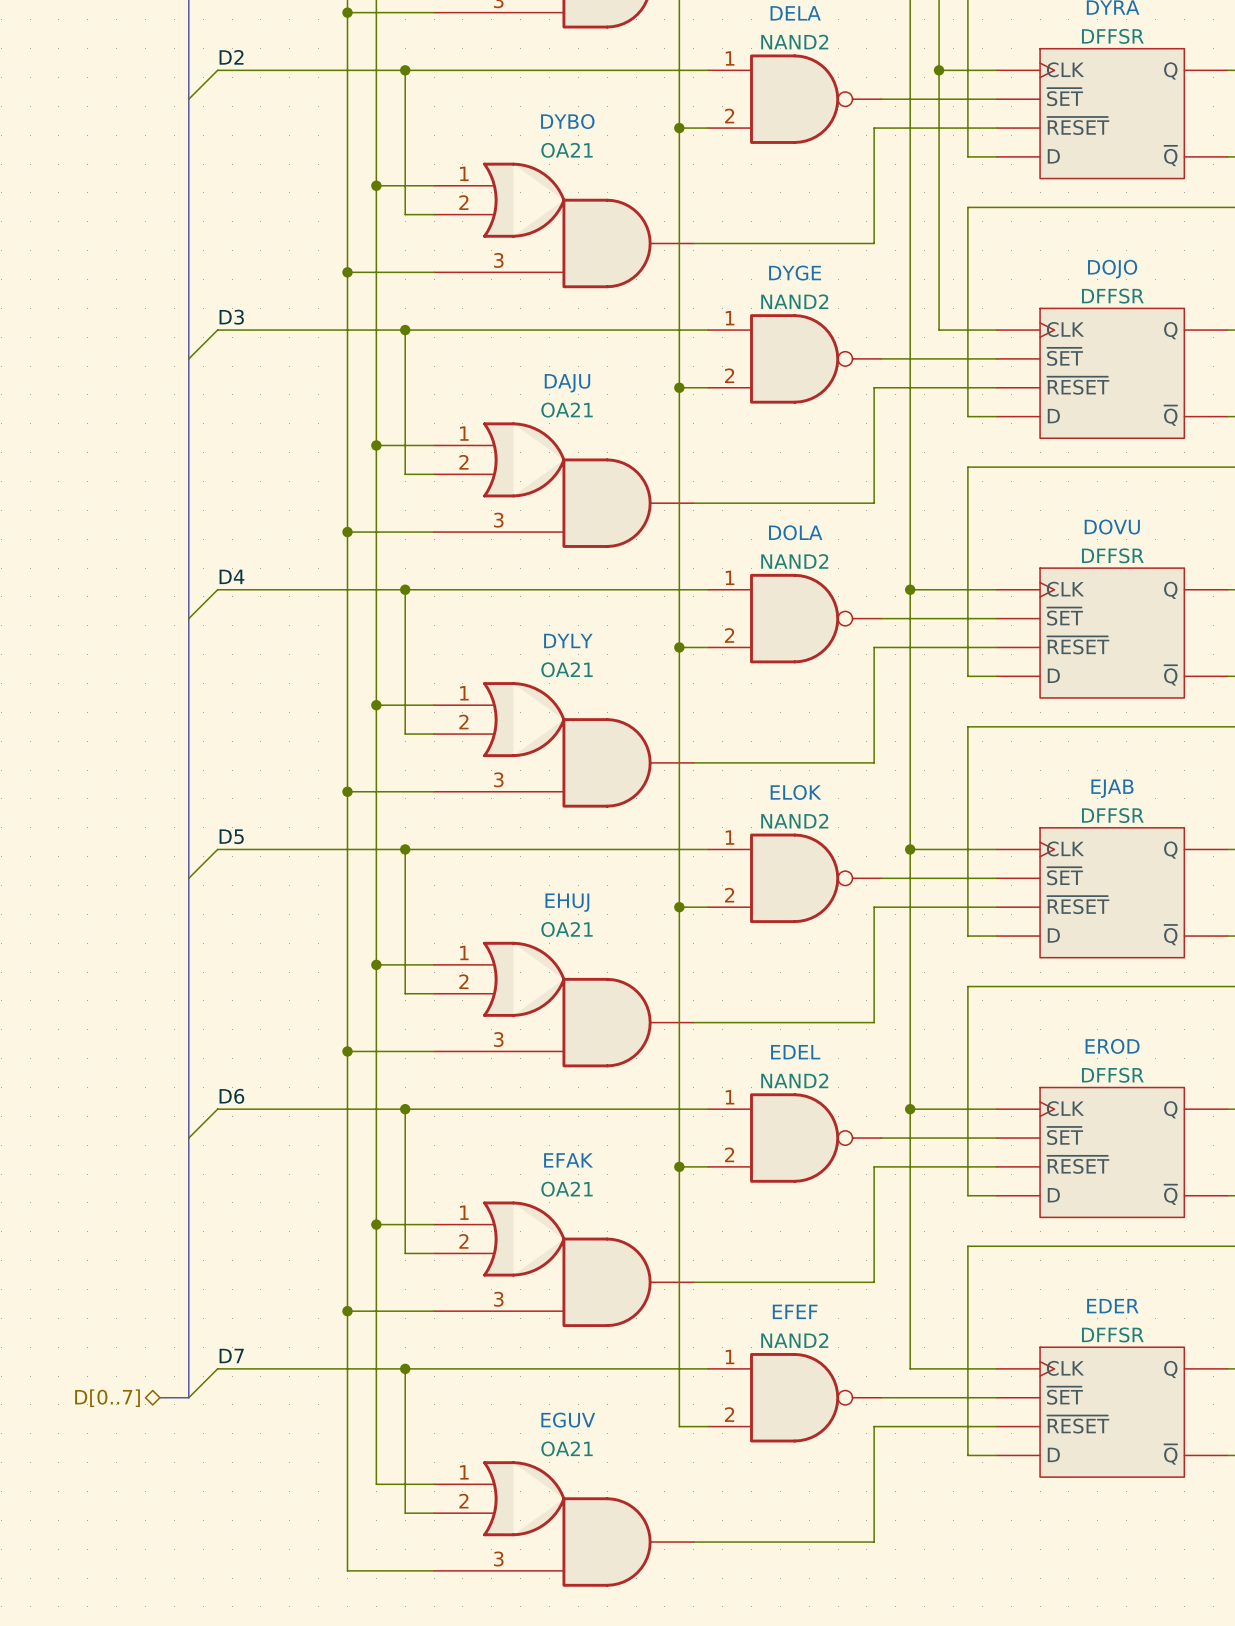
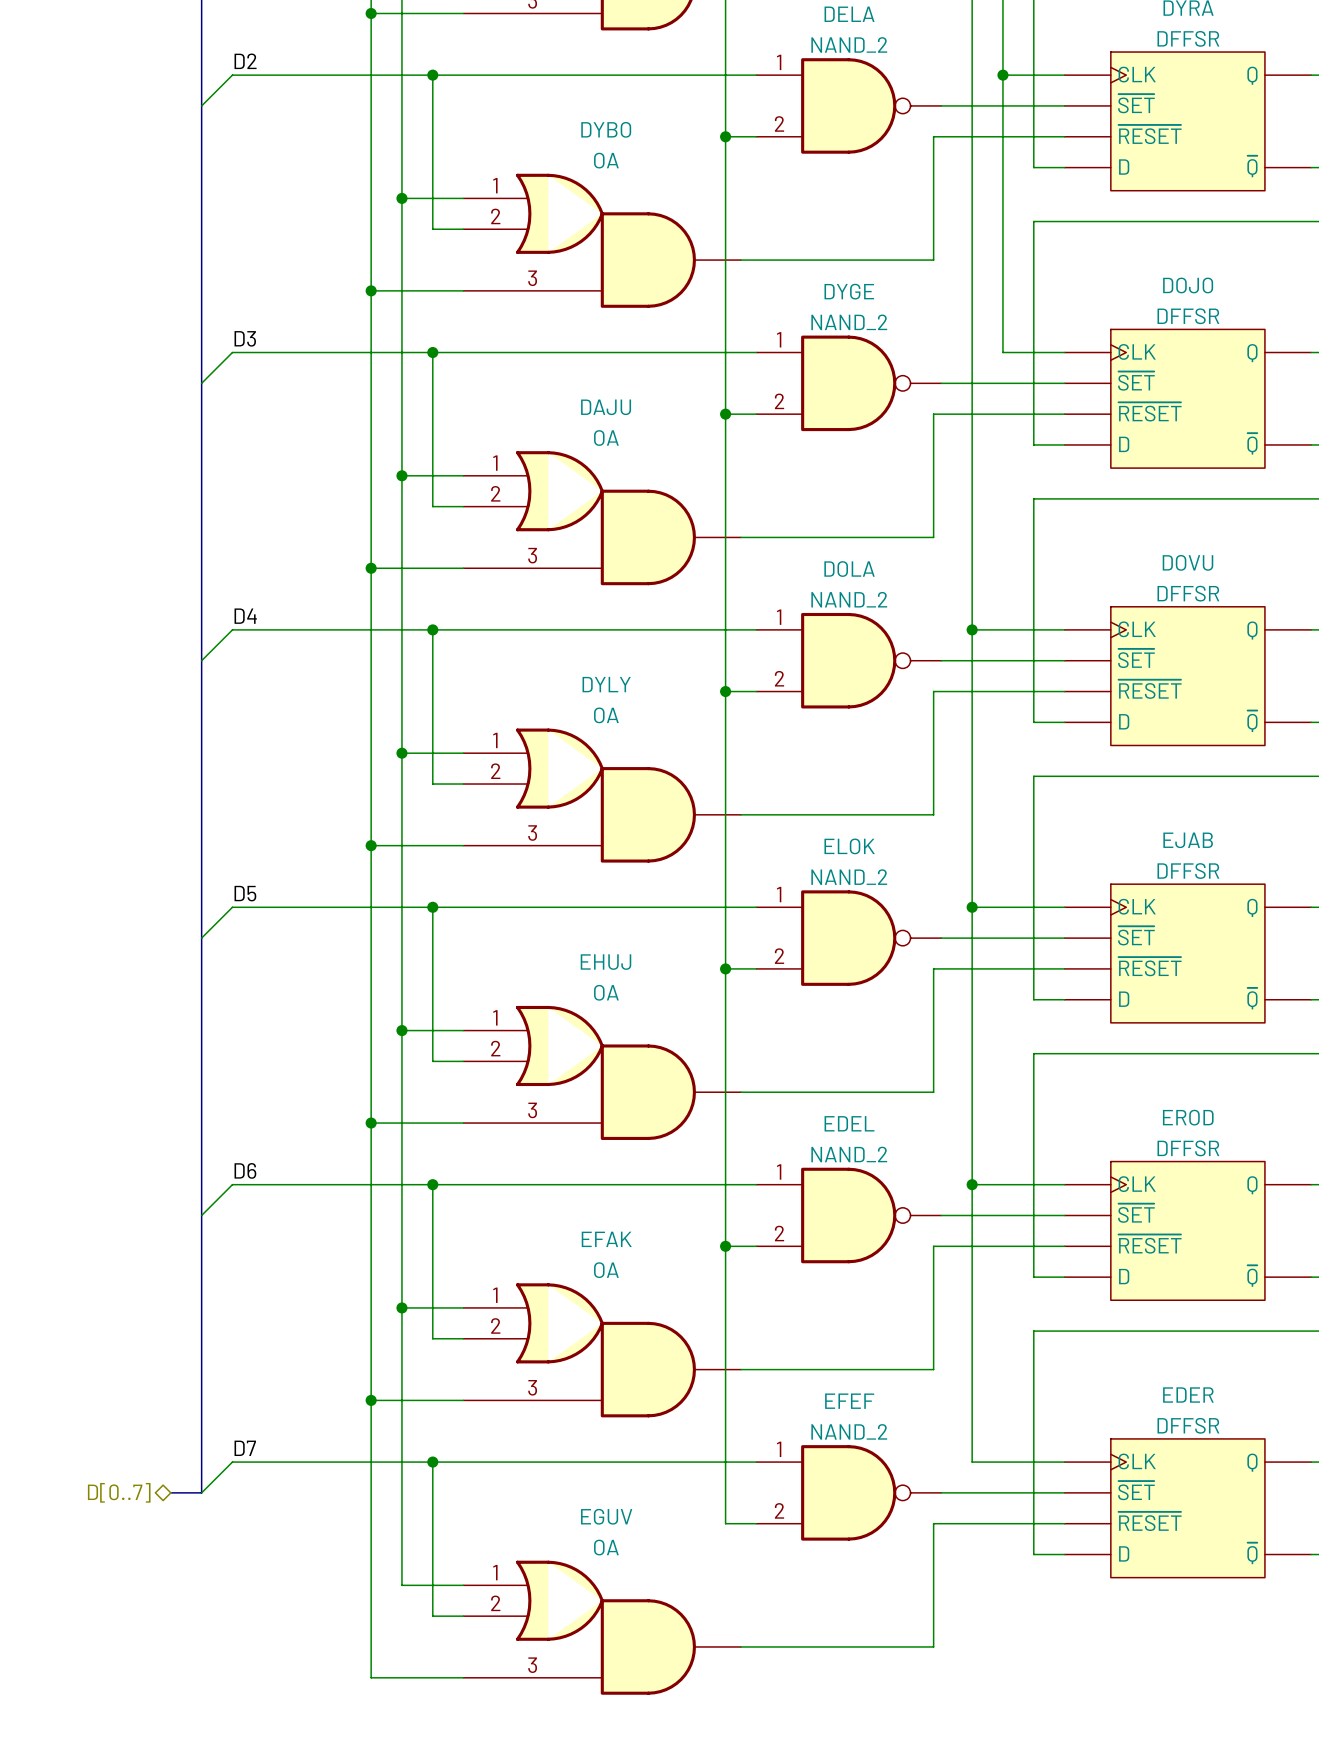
DELA value: NAND2 (794, 42) -> NAND_2 (849, 44)
DYBO value: OA21 (567, 150) -> OA (606, 160)
DYGE value: NAND2 (794, 301) -> NAND_2 (849, 322)
DAJU value: OA21 (567, 410) -> OA (606, 438)
DOLA value: NAND2 (794, 561) -> NAND_2 (849, 599)
DYLY value: OA21 (567, 669) -> OA (606, 715)
ELOK value: NAND2 (794, 821) -> NAND_2 (849, 877)
EHUJ value: OA21 (567, 929) -> OA (606, 992)
EDEL value: NAND2 (794, 1080) -> NAND_2 (849, 1154)
EFAK value: OA21 (567, 1189) -> OA (606, 1270)
EFEF value: NAND2 (794, 1340) -> NAND_2 (849, 1431)
EGUV value: OA21 (567, 1448) -> OA (606, 1547)

